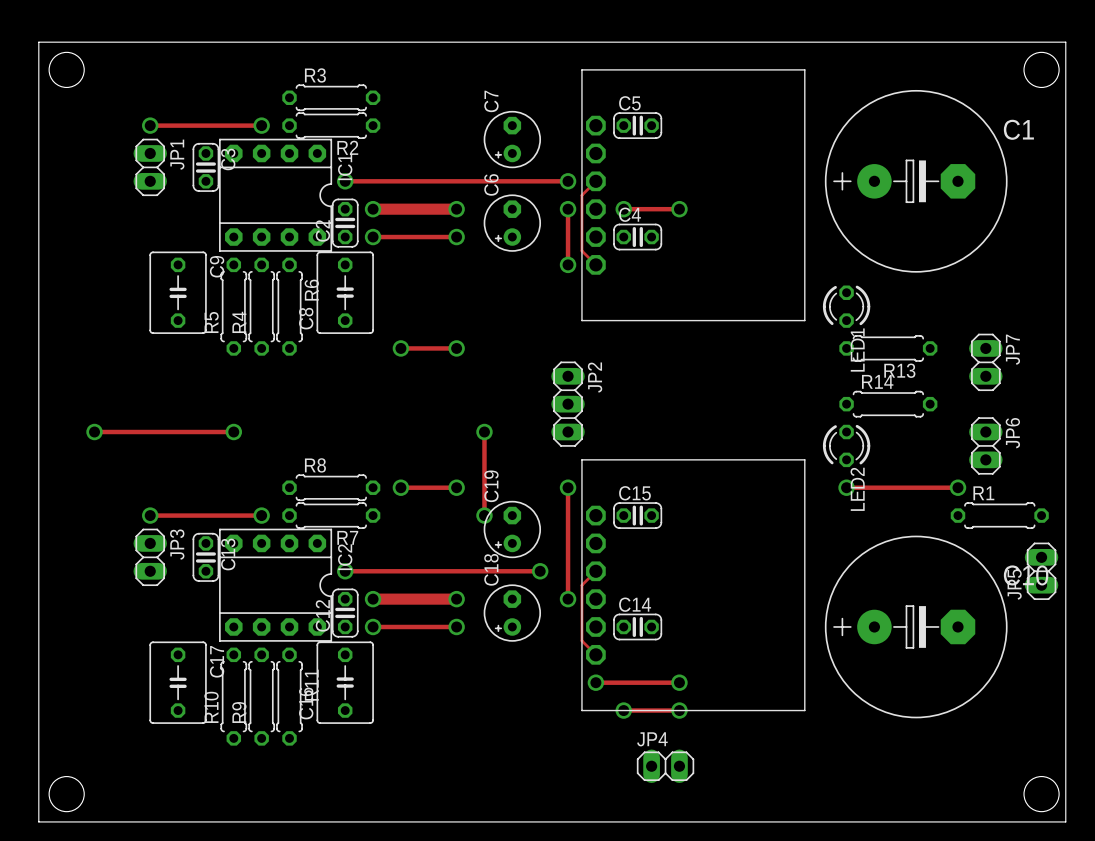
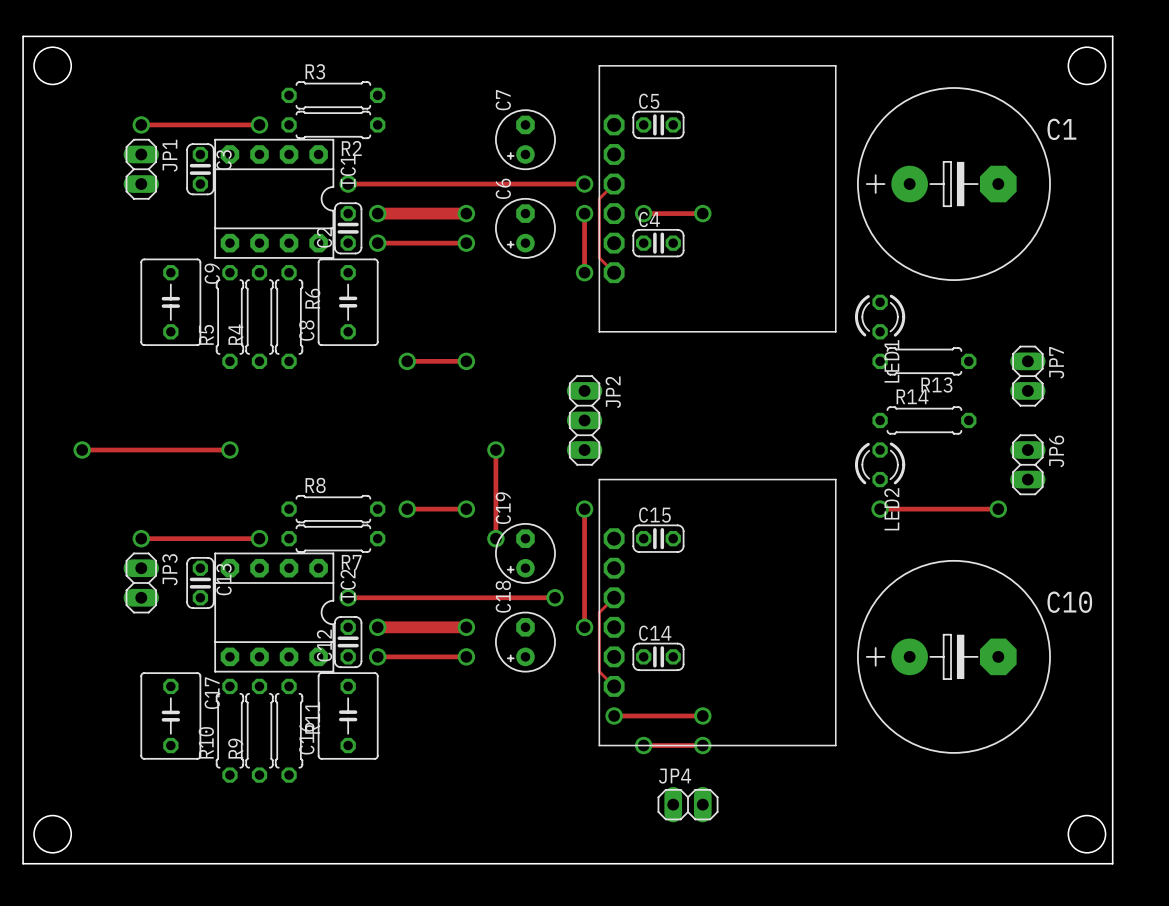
R1: (999, 515) -> none
JP5: (1041, 571) -> none

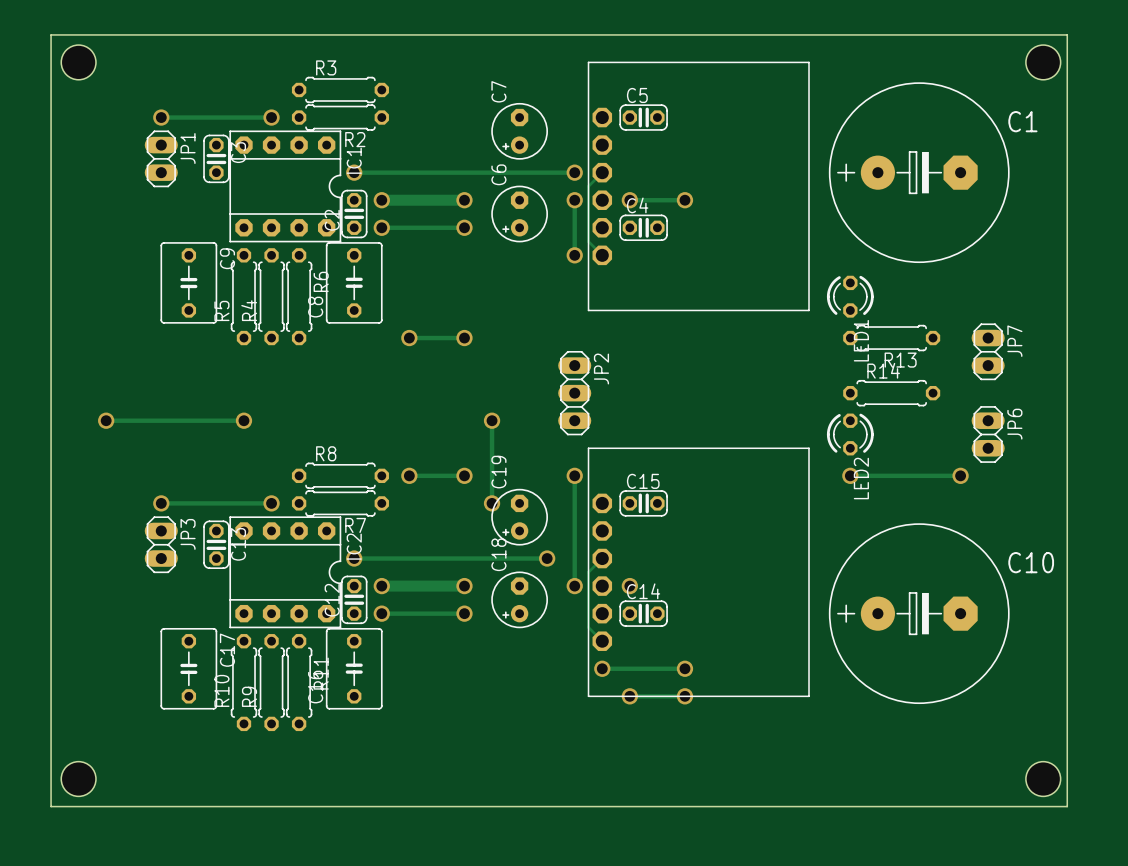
via: none -> (629, 586)
JP4: (688, 804) -> none

